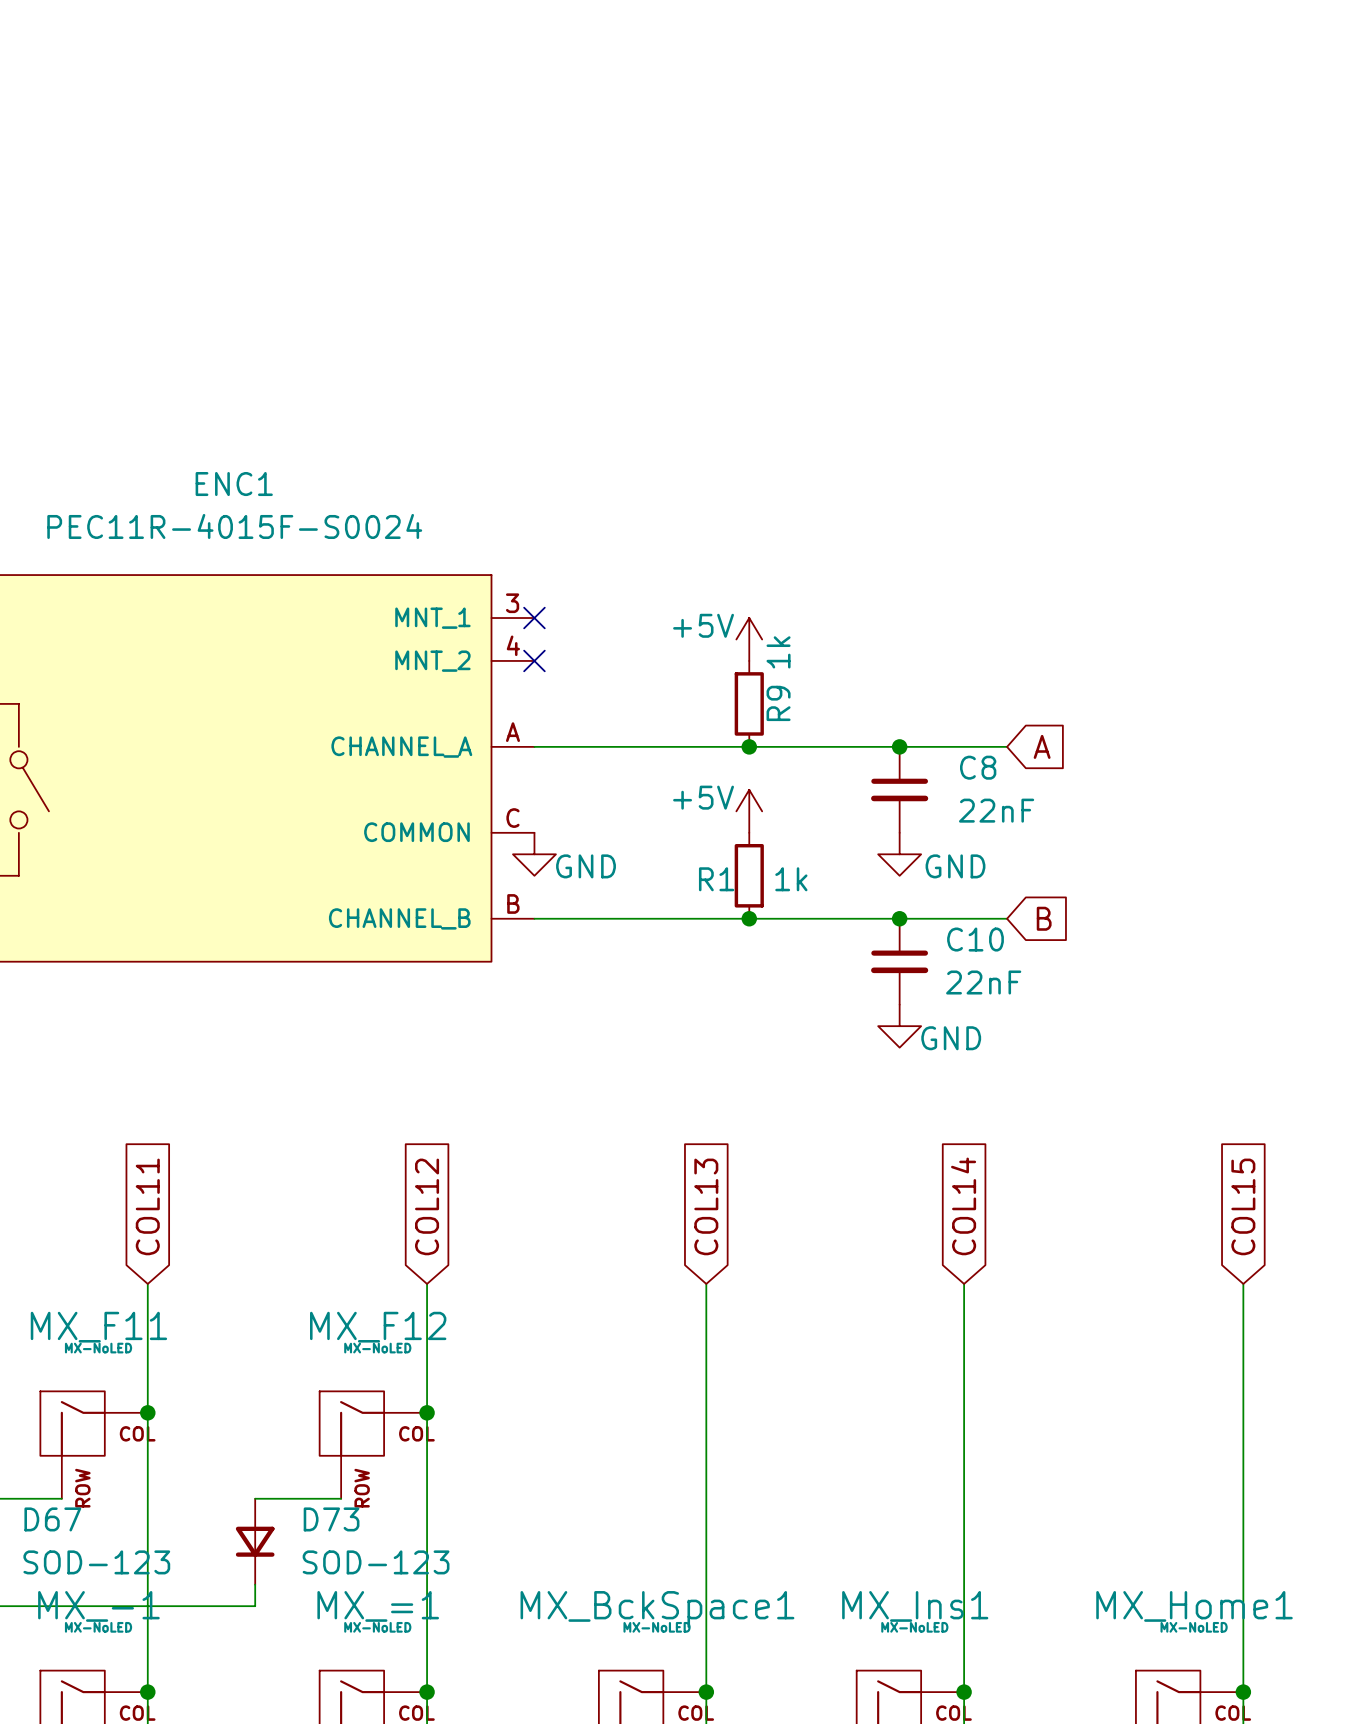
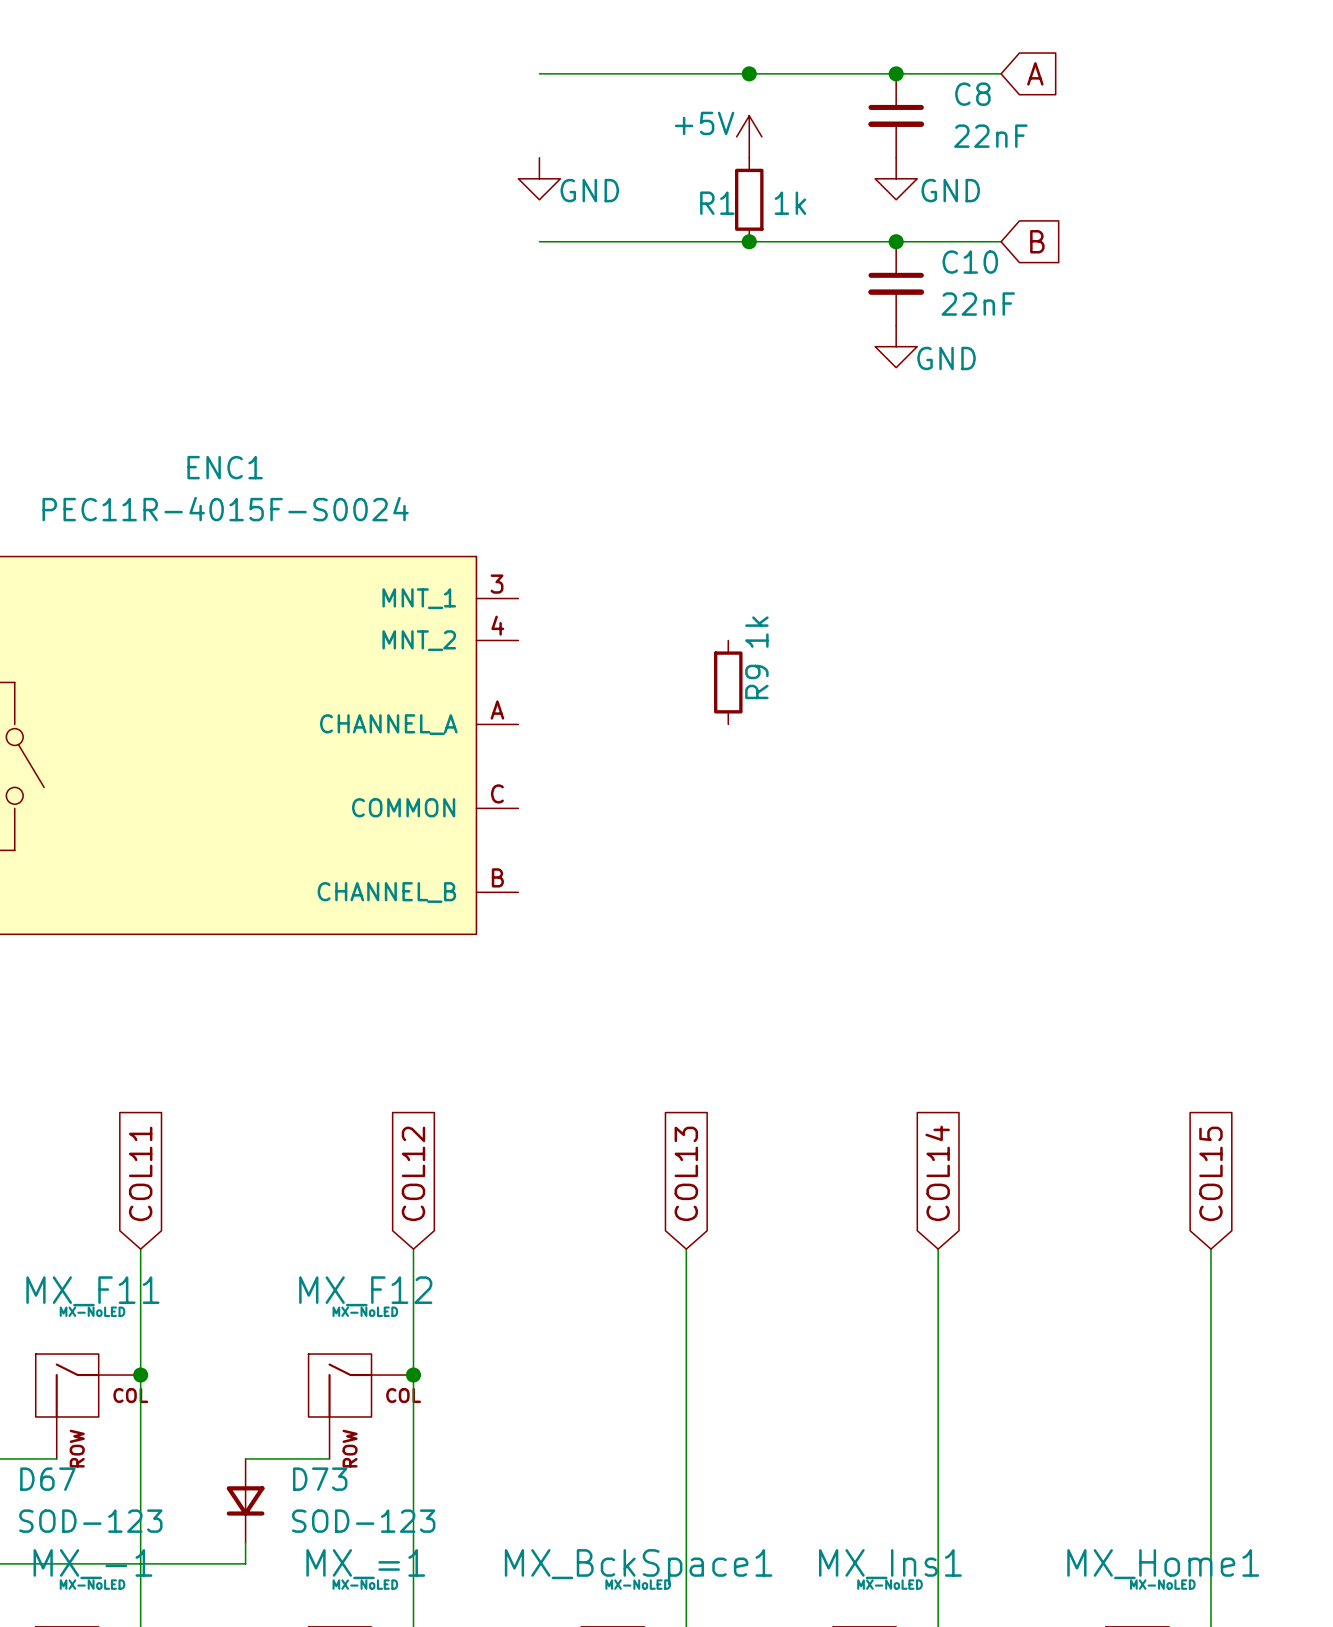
wire: none -> (539, 73) (1001, 73)
junction: none -> (749, 73)
junction: none -> (896, 73)
global label: none -> A (1035, 73)
power symbol: none -> +5V (749, 136)
power symbol: none -> GND (539, 178)
power symbol: none -> GND (896, 178)
wire: none -> (539, 241) (1001, 241)
junction: none -> (749, 241)
junction: none -> (896, 241)
global label: none -> B (1037, 241)
power symbol: none -> GND (896, 346)
no-connect mark: (534, 618) -> none
power symbol: +5V (749, 639) -> none
no-connect mark: (534, 660) -> none
wire: (534, 746) (1007, 746) -> none
junction: (749, 746) -> none
junction: (899, 746) -> none
global label: A (1042, 746) -> none
C8 position: (899, 789) -> (896, 115)
power symbol: +5V (749, 811) -> none
power symbol: GND (534, 854) -> none
power symbol: GND (899, 854) -> none
R1 position: (749, 875) -> (749, 199)
wire: (534, 918) (1007, 918) -> none
junction: (749, 918) -> none
junction: (899, 918) -> none
global label: B (1044, 918) -> none
C10 position: (899, 961) -> (896, 283)
power symbol: GND (899, 1026) -> none

